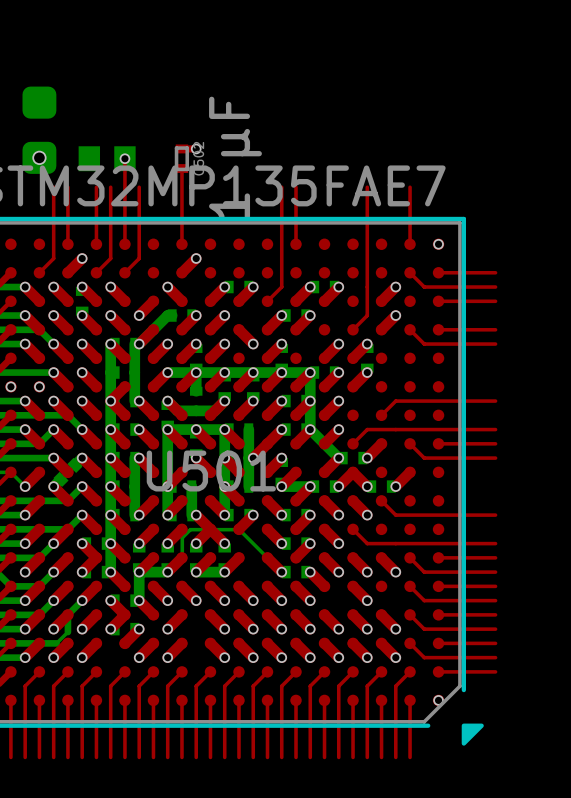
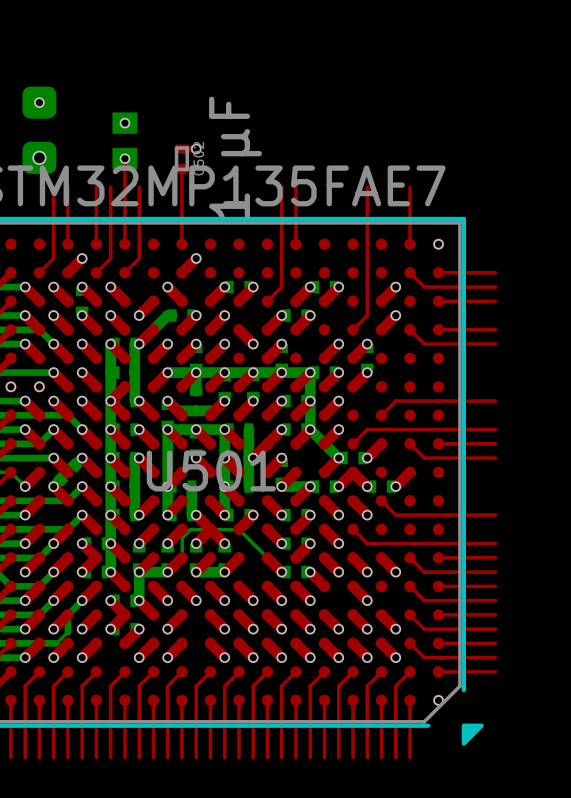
via: none -> (39, 102)
via: none -> (124, 123)
part rotation: 0° (107, 158) -> 90° clockwise (124, 140)

